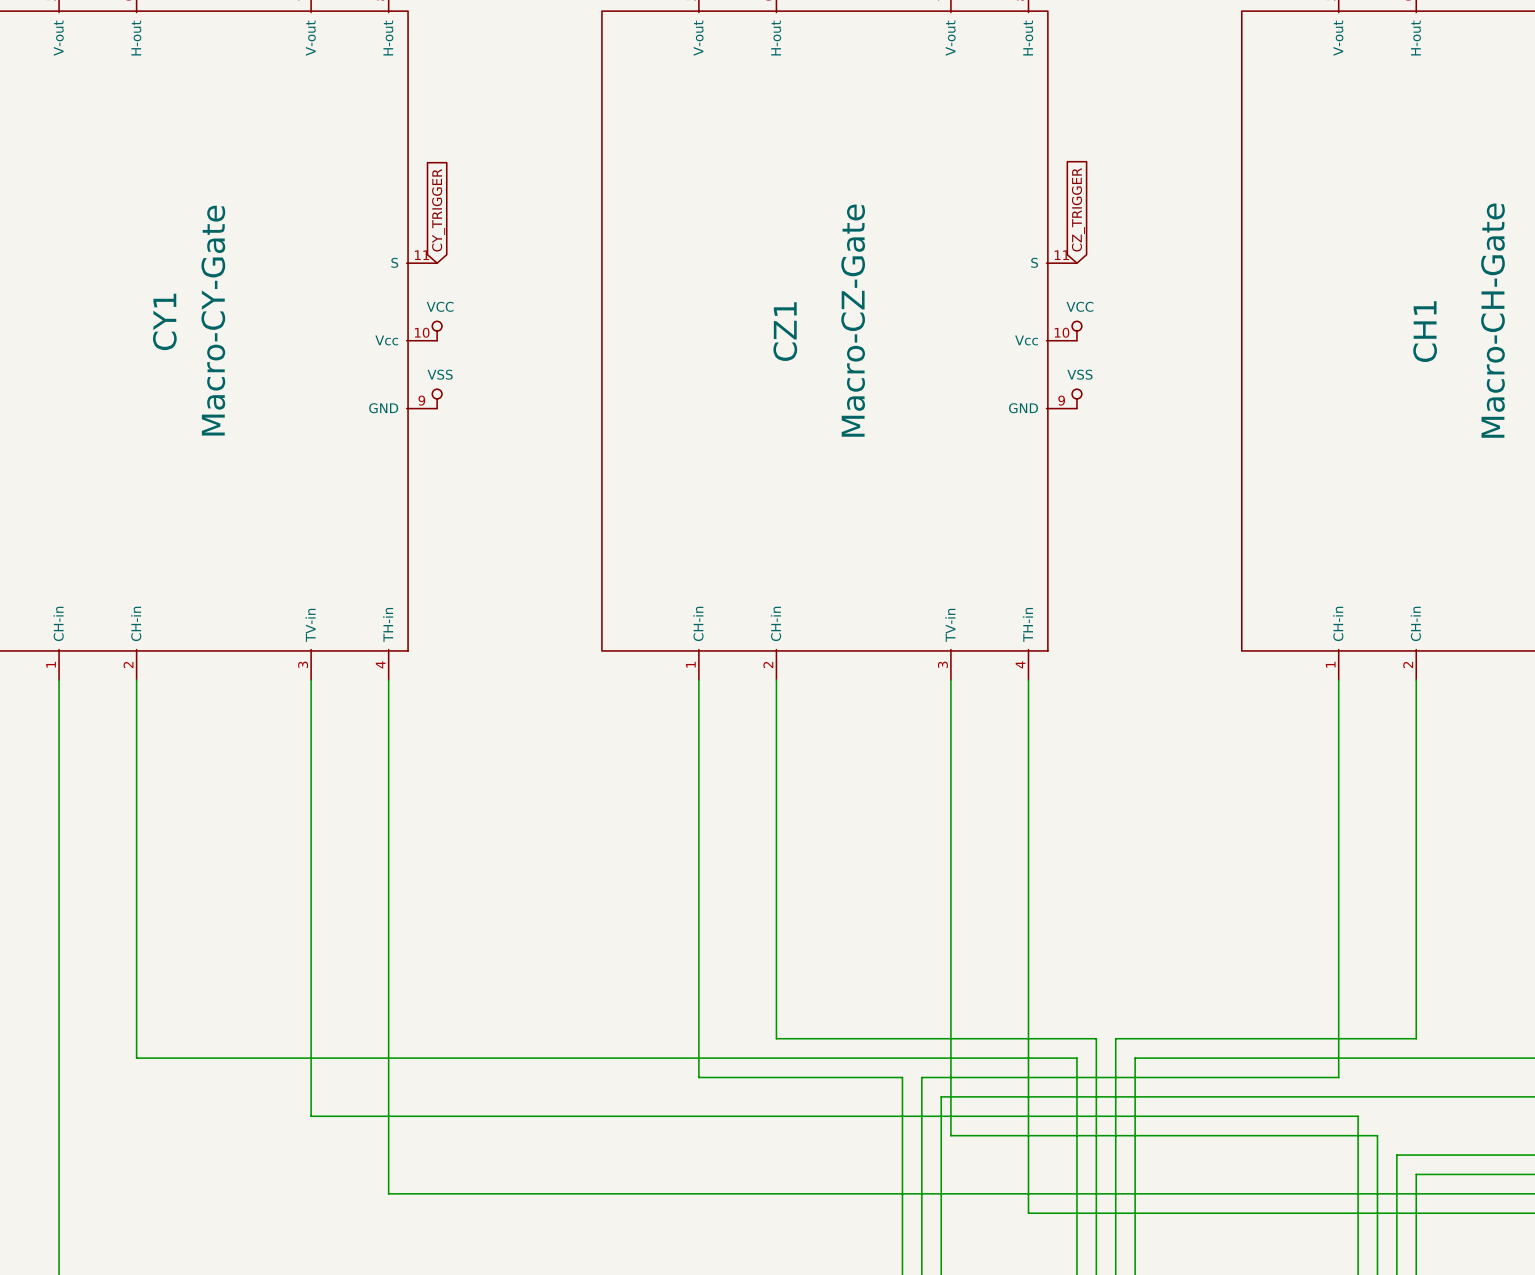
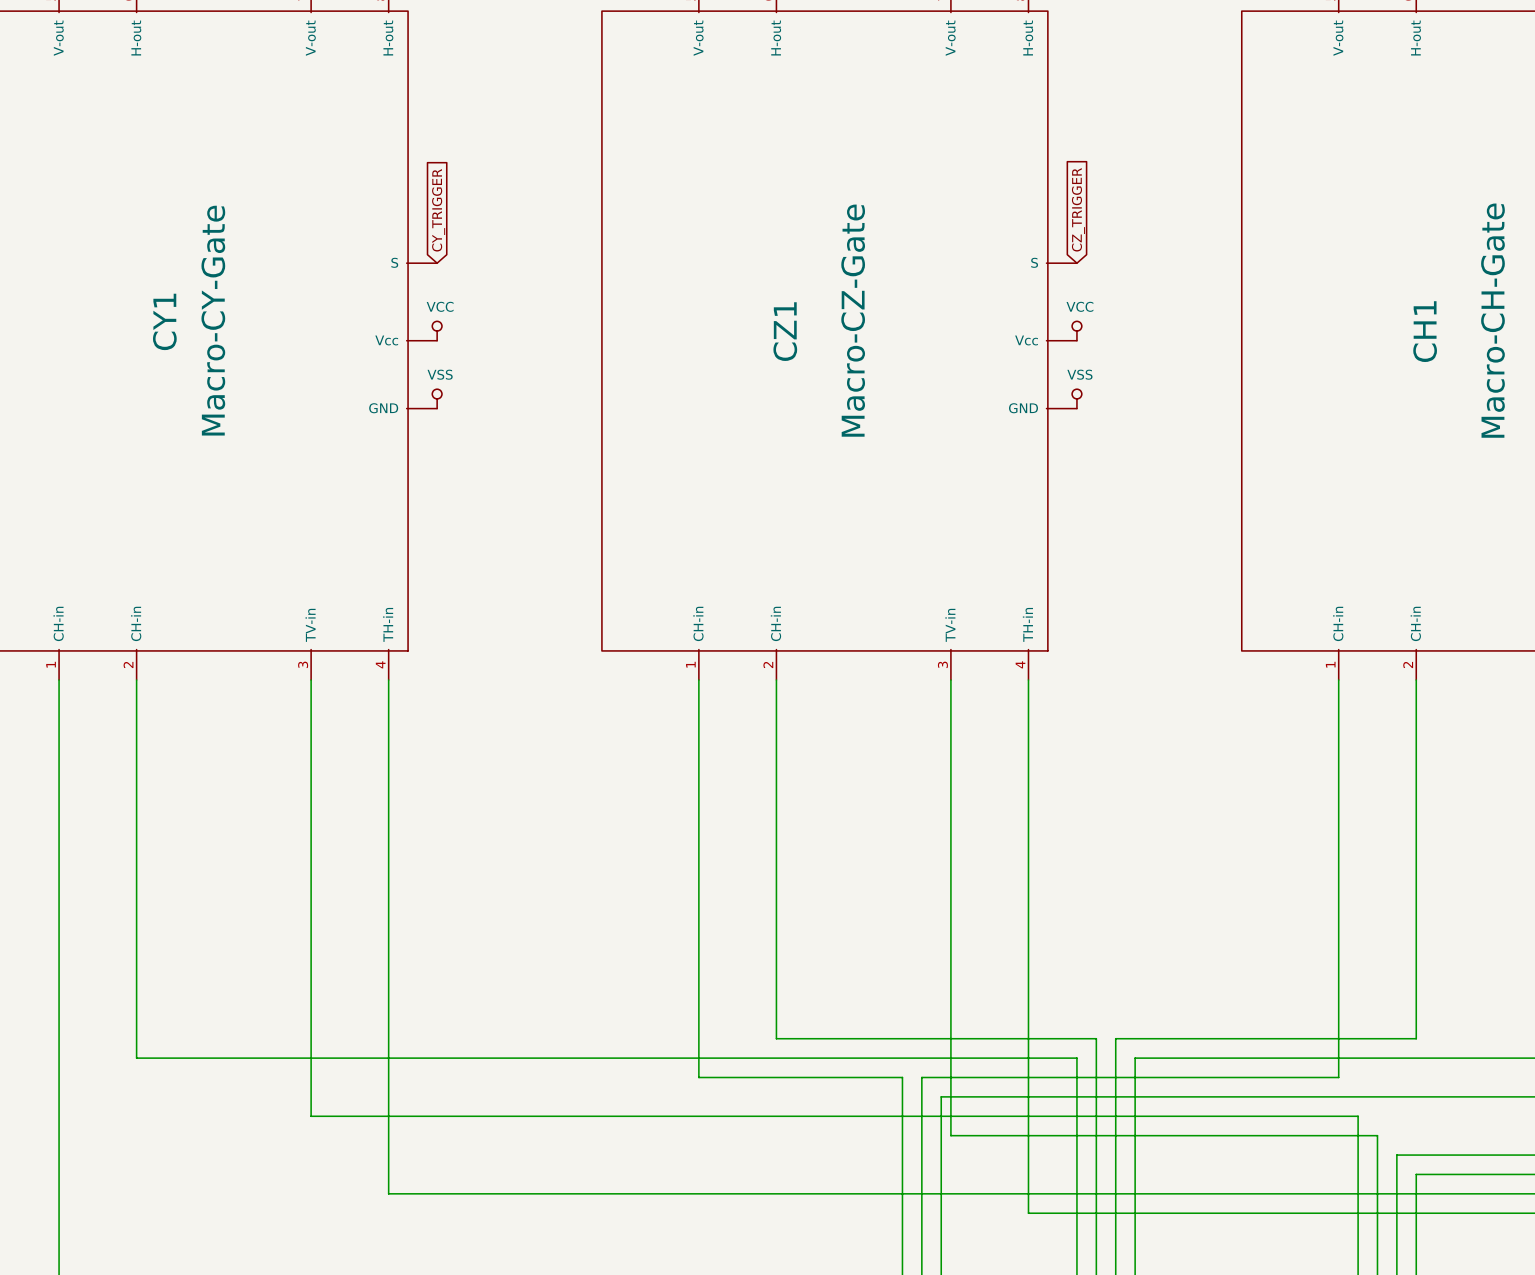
CY1 pin number: 11 (422, 255) -> none
CZ1 pin number: 11 (1061, 255) -> none
CY1 pin number: 10 (422, 332) -> none
CZ1 pin number: 10 (1062, 332) -> none
CY1 pin number: 9 (421, 400) -> none
CZ1 pin number: 9 (1061, 400) -> none

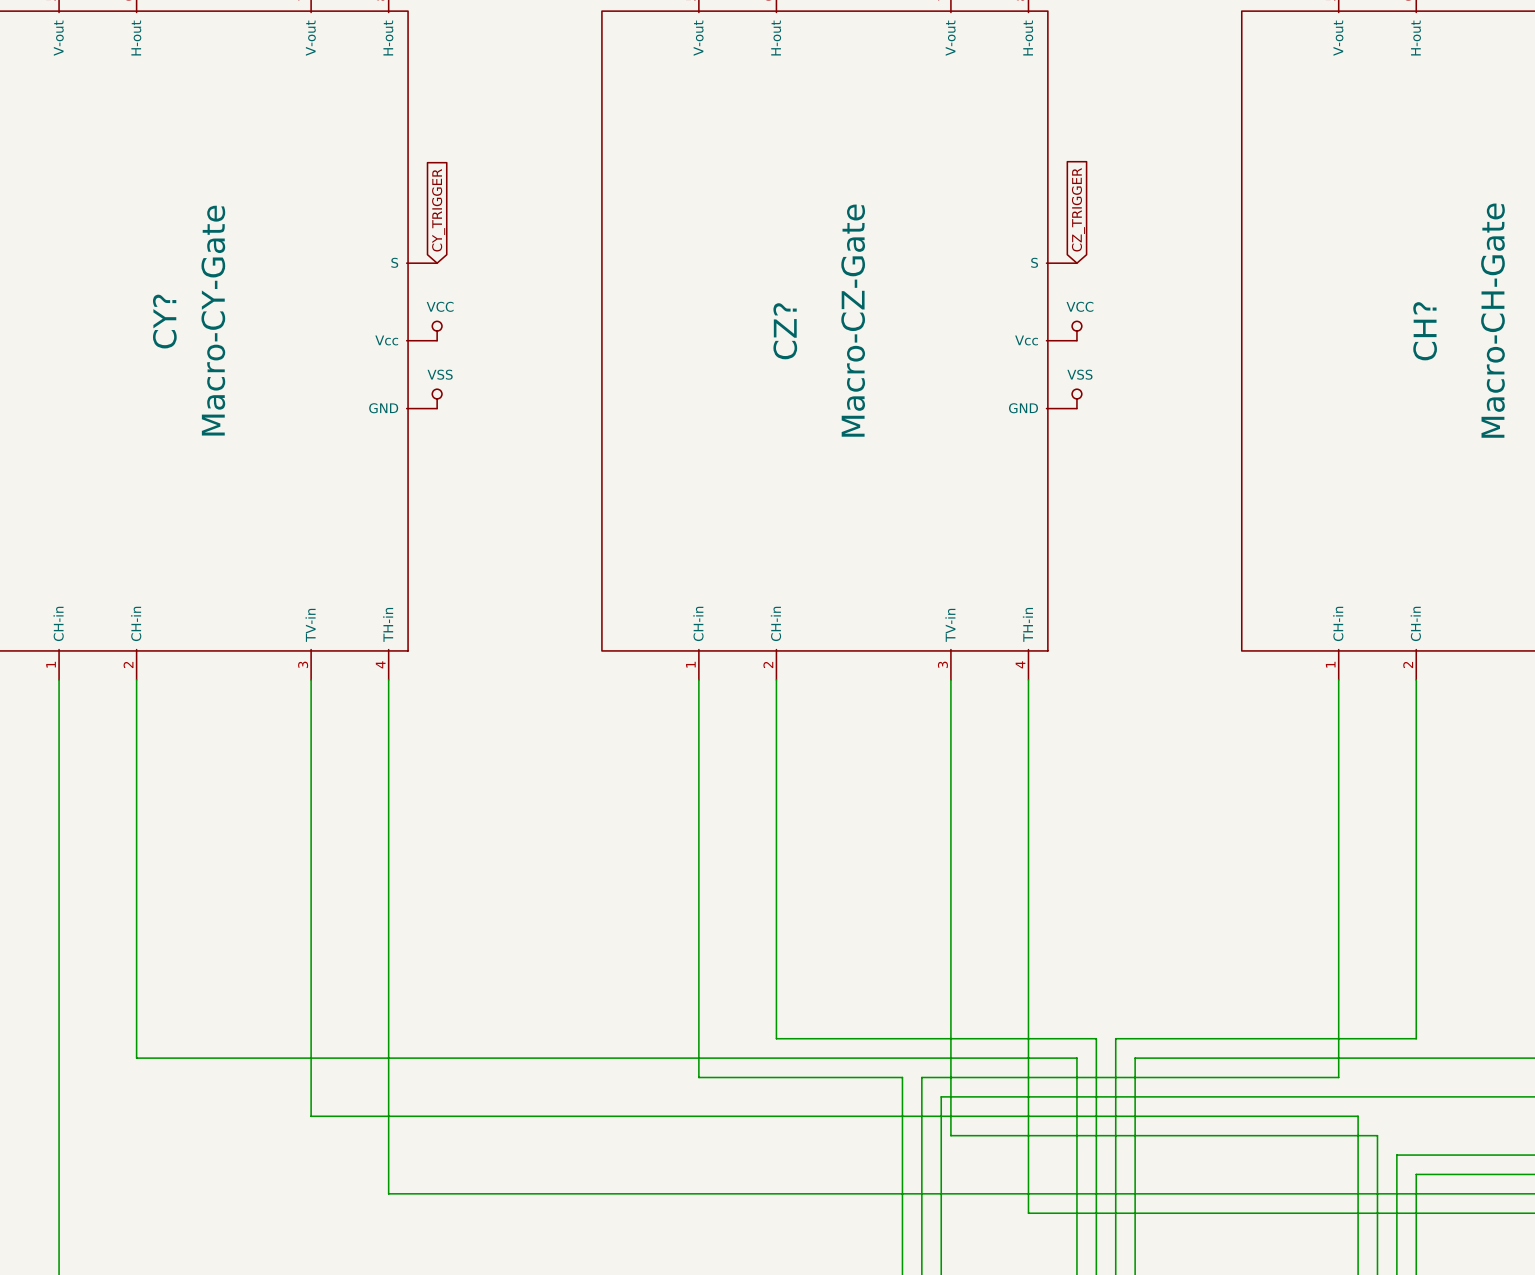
CY1 name: CY1 (164, 321) -> CY? (164, 321)
CZ1 name: CZ1 (785, 331) -> CZ? (785, 331)
CH1 name: CH1 (1425, 331) -> CH? (1425, 331)

